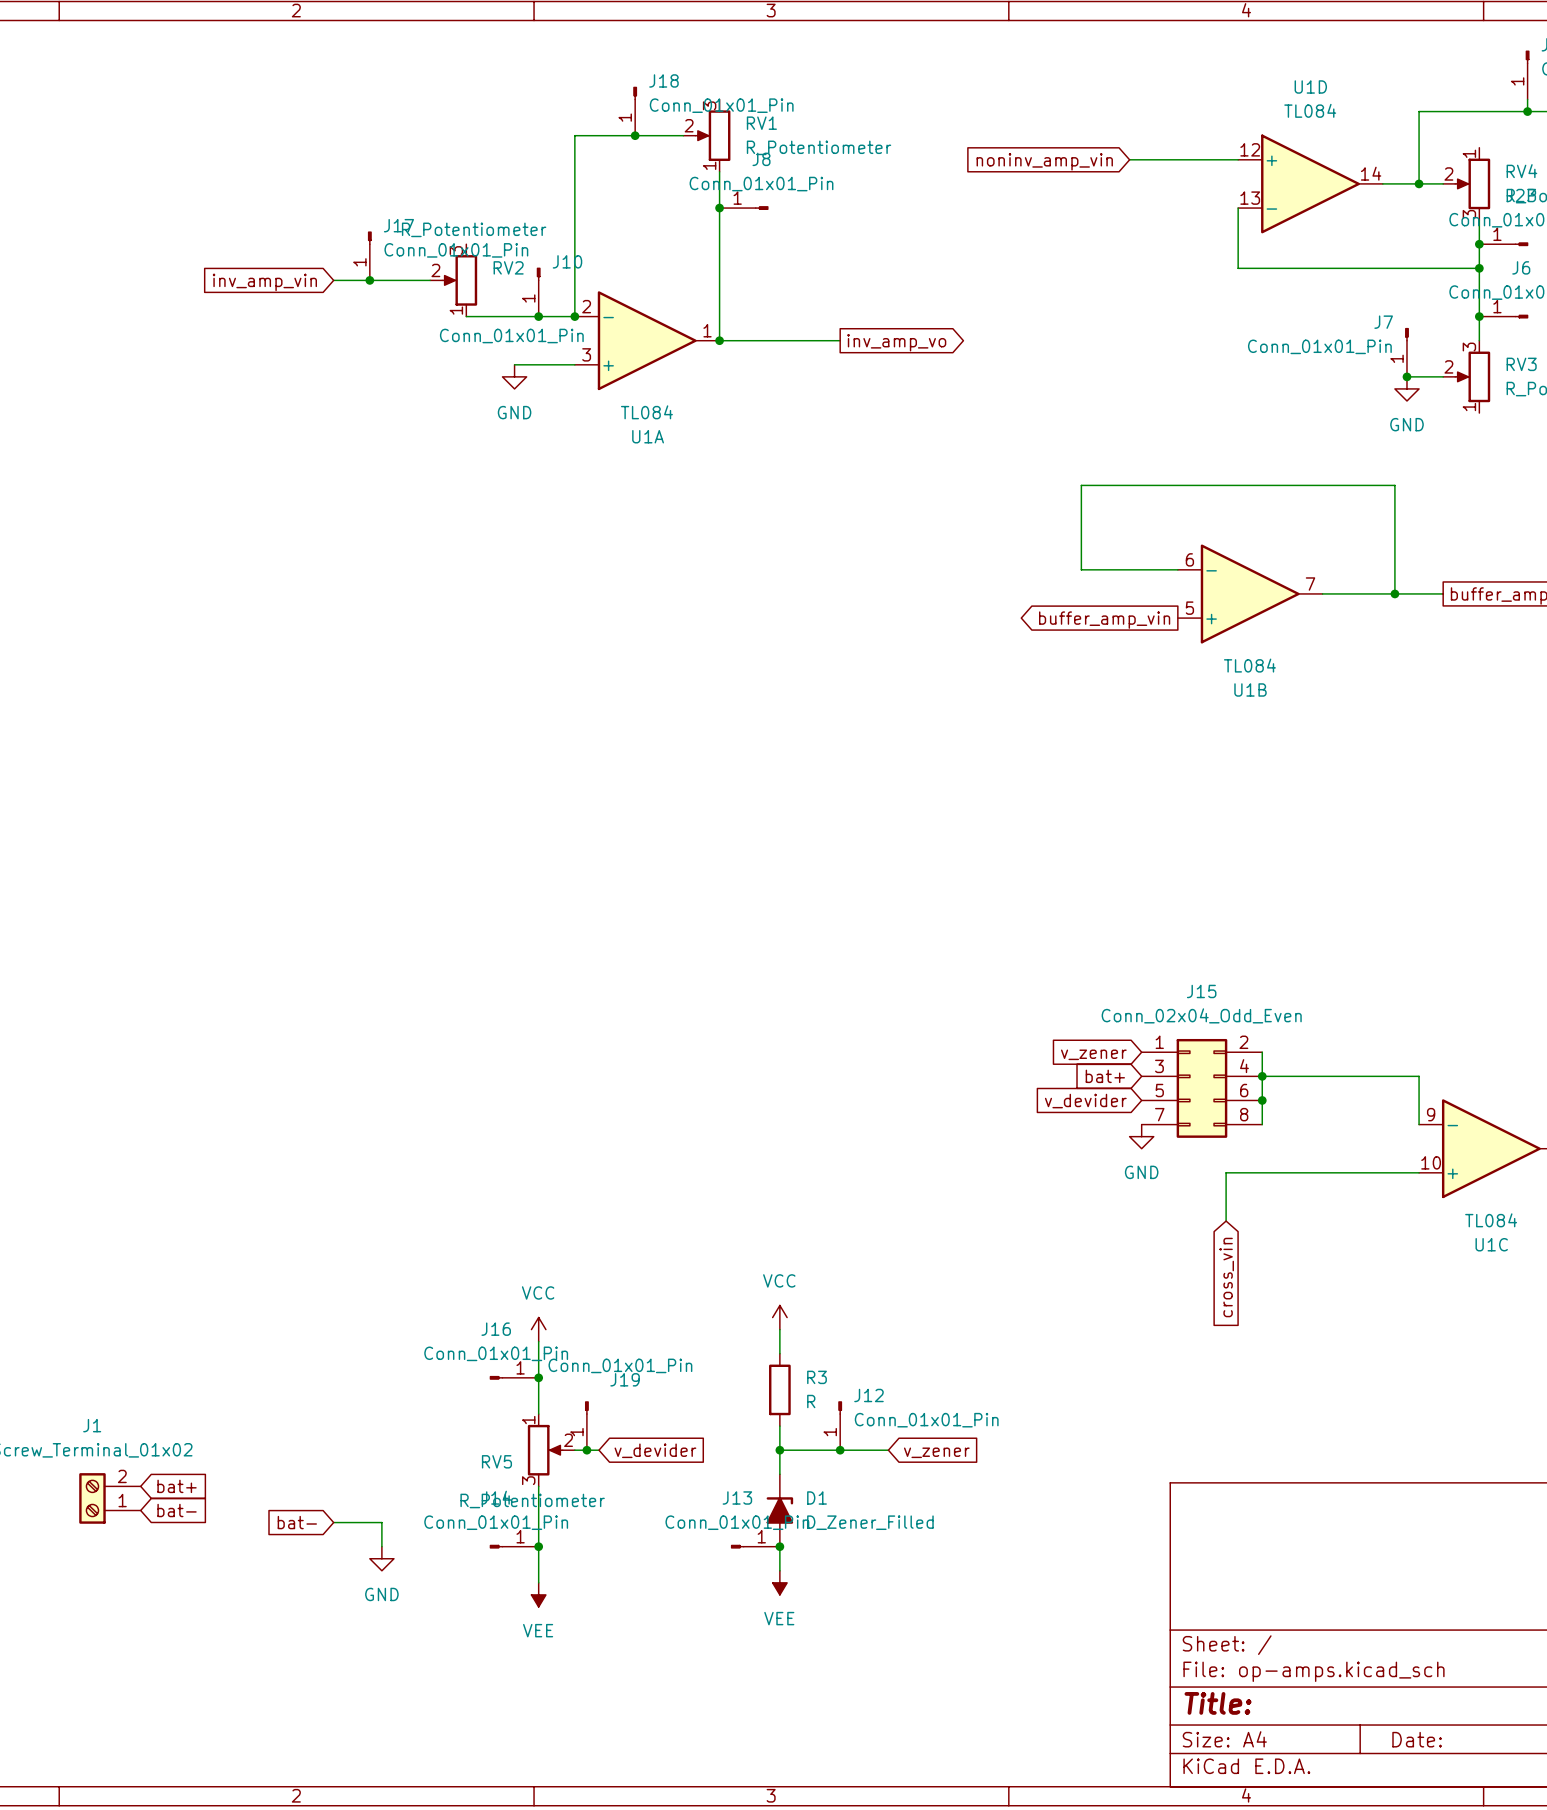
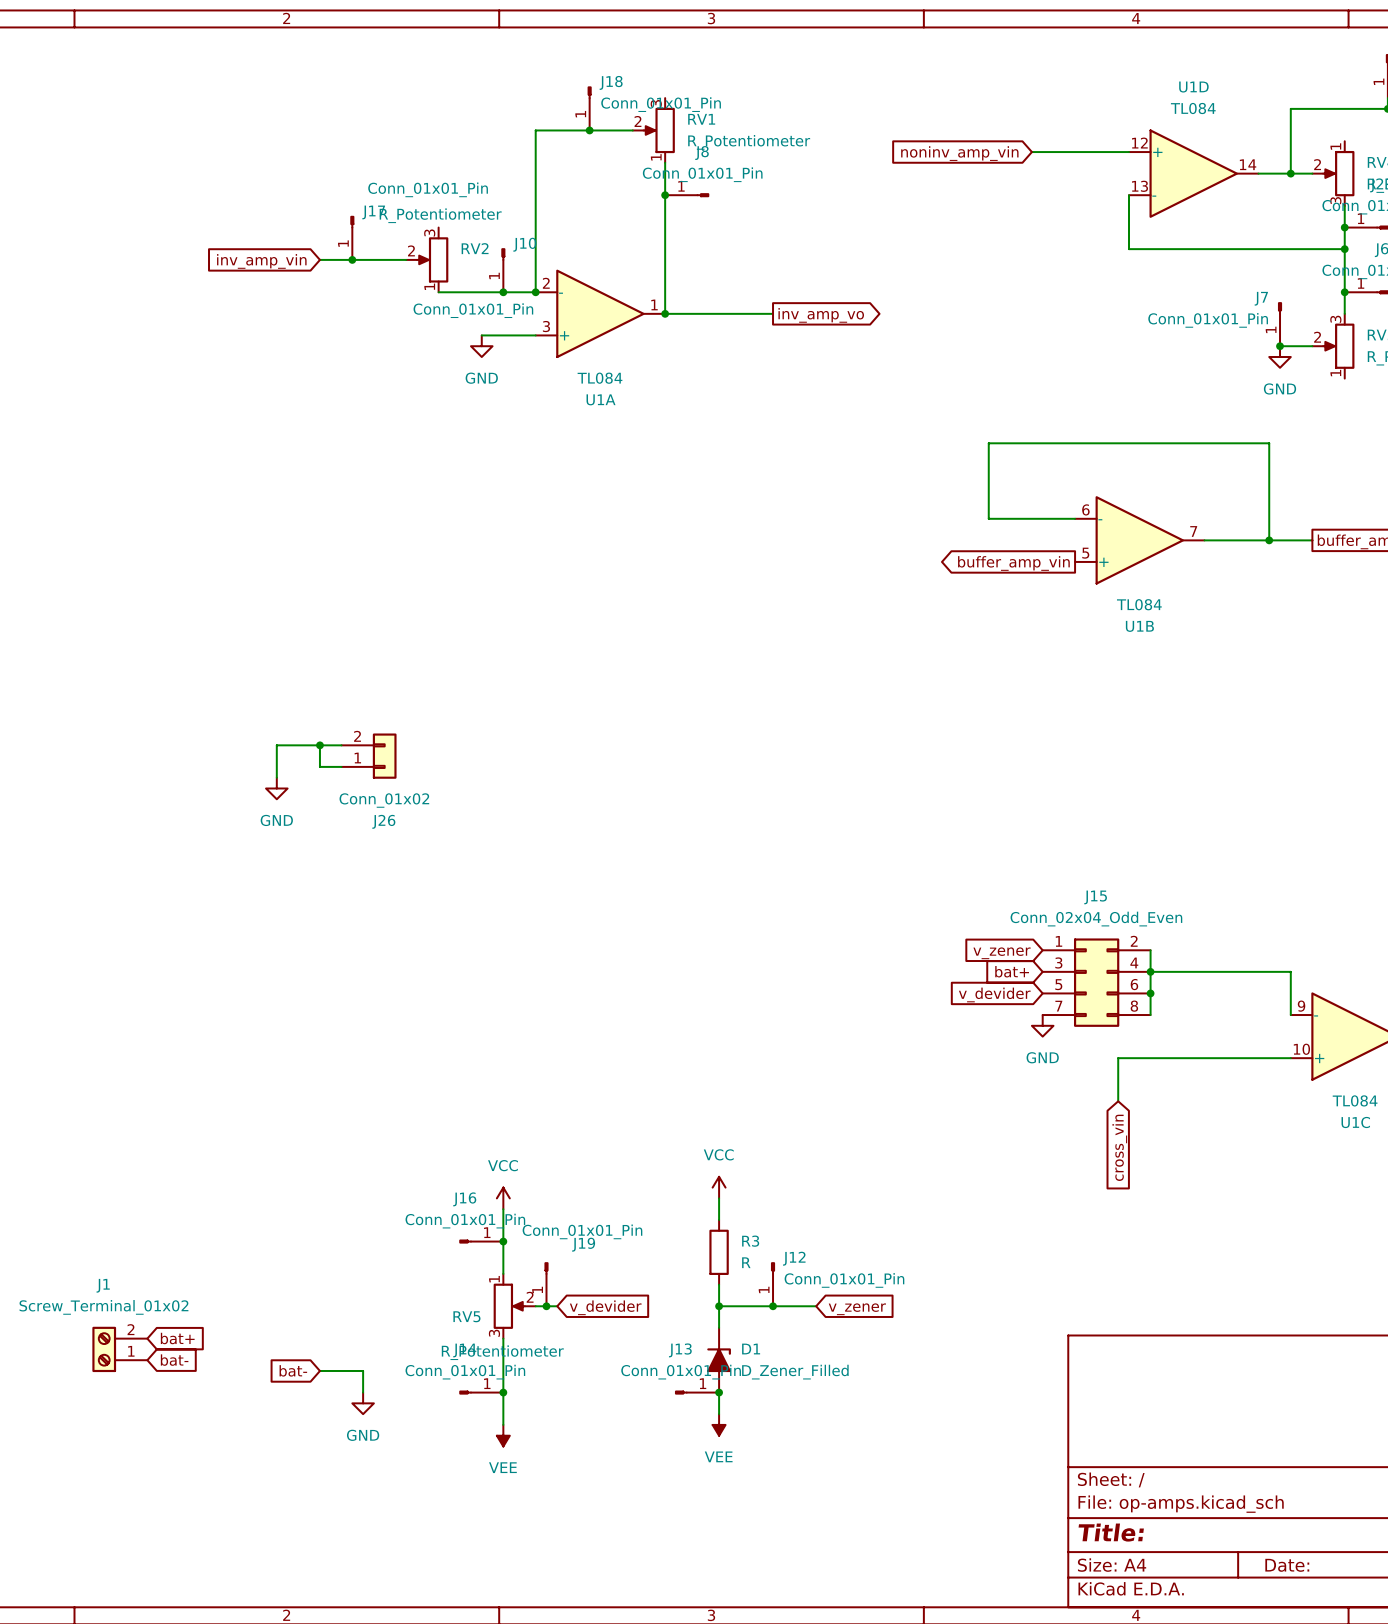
J17 value position: Conn_01x01_Pin (456, 250) -> Conn_01x01_Pin (428, 189)
wire: none -> (319, 745) (319, 766) (341, 766)
junction: none -> (319, 745)
wire: none -> (341, 745) (276, 745) (276, 777)
J26: none -> Conn_01x02 (369, 756)
power symbol: none -> GND (276, 788)

